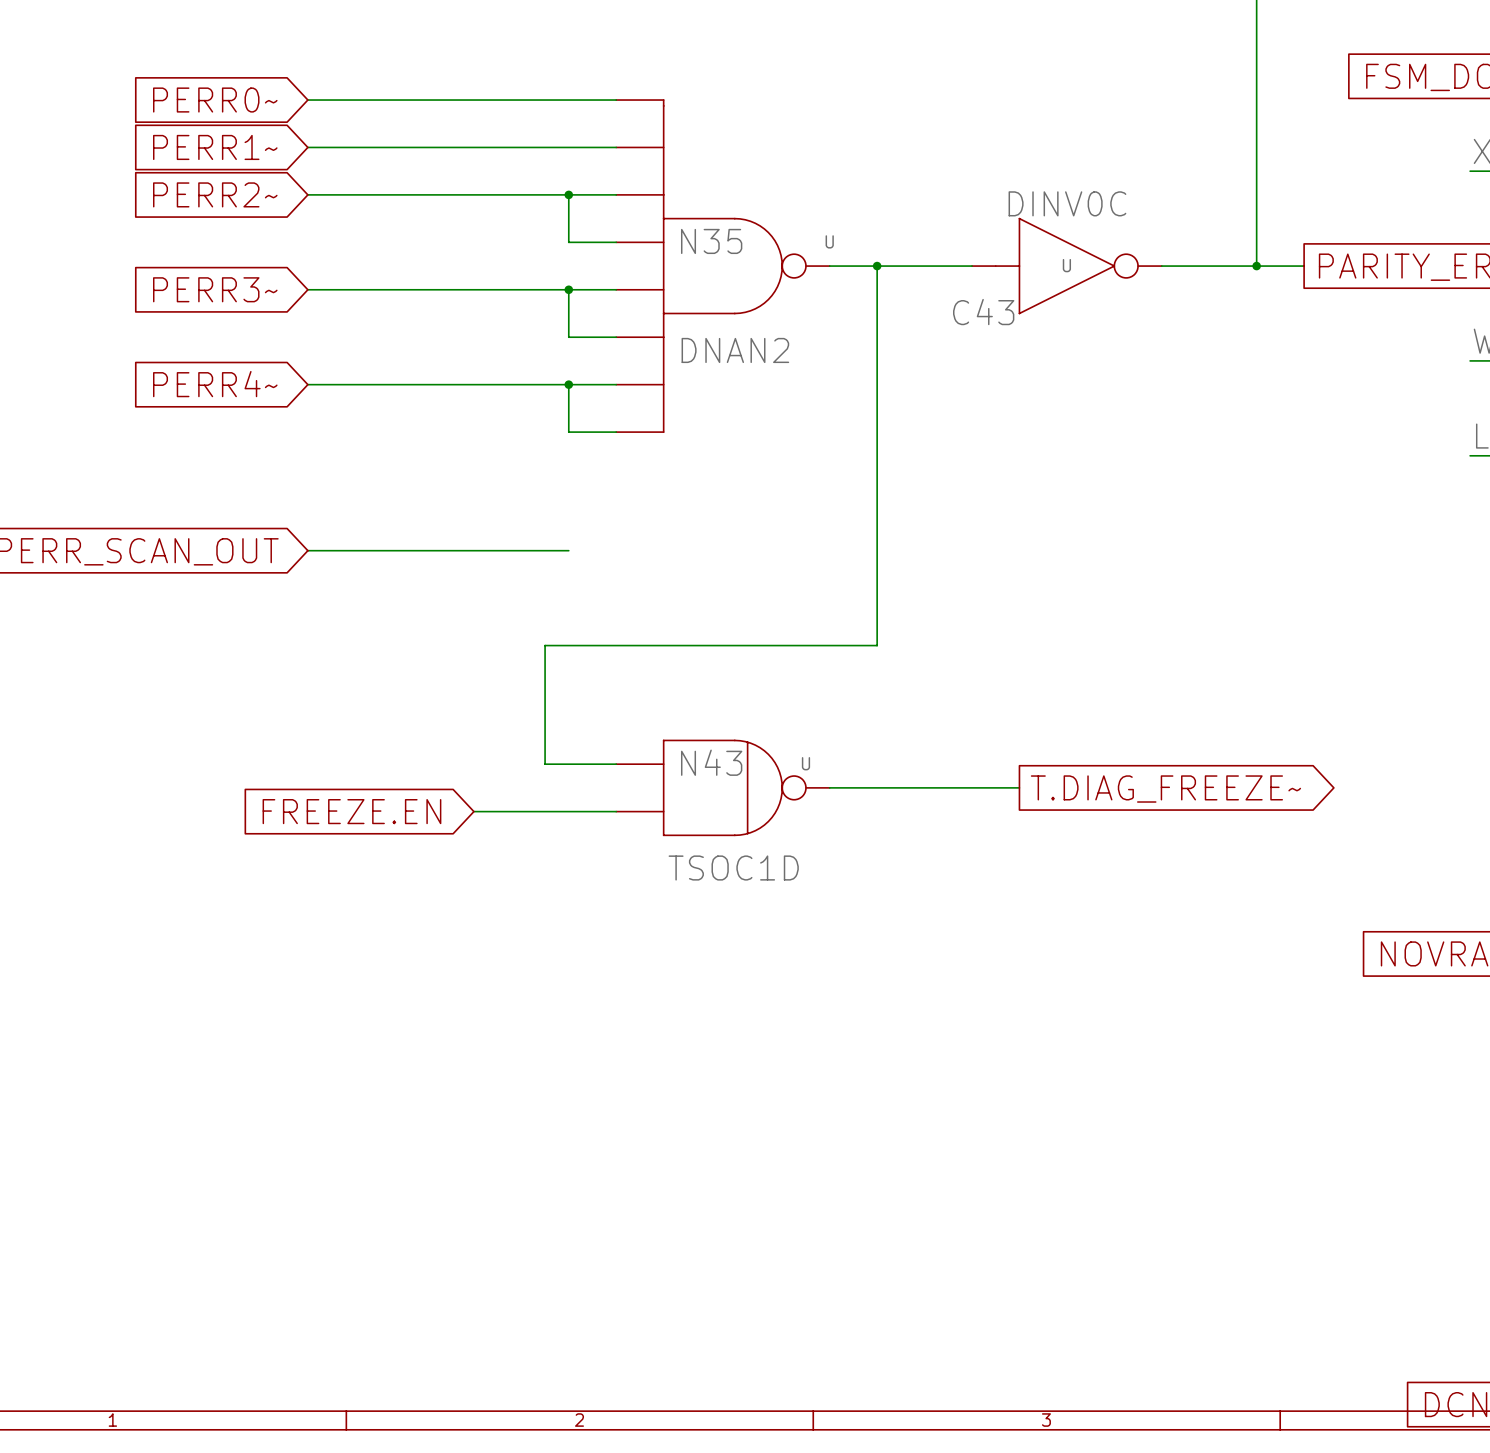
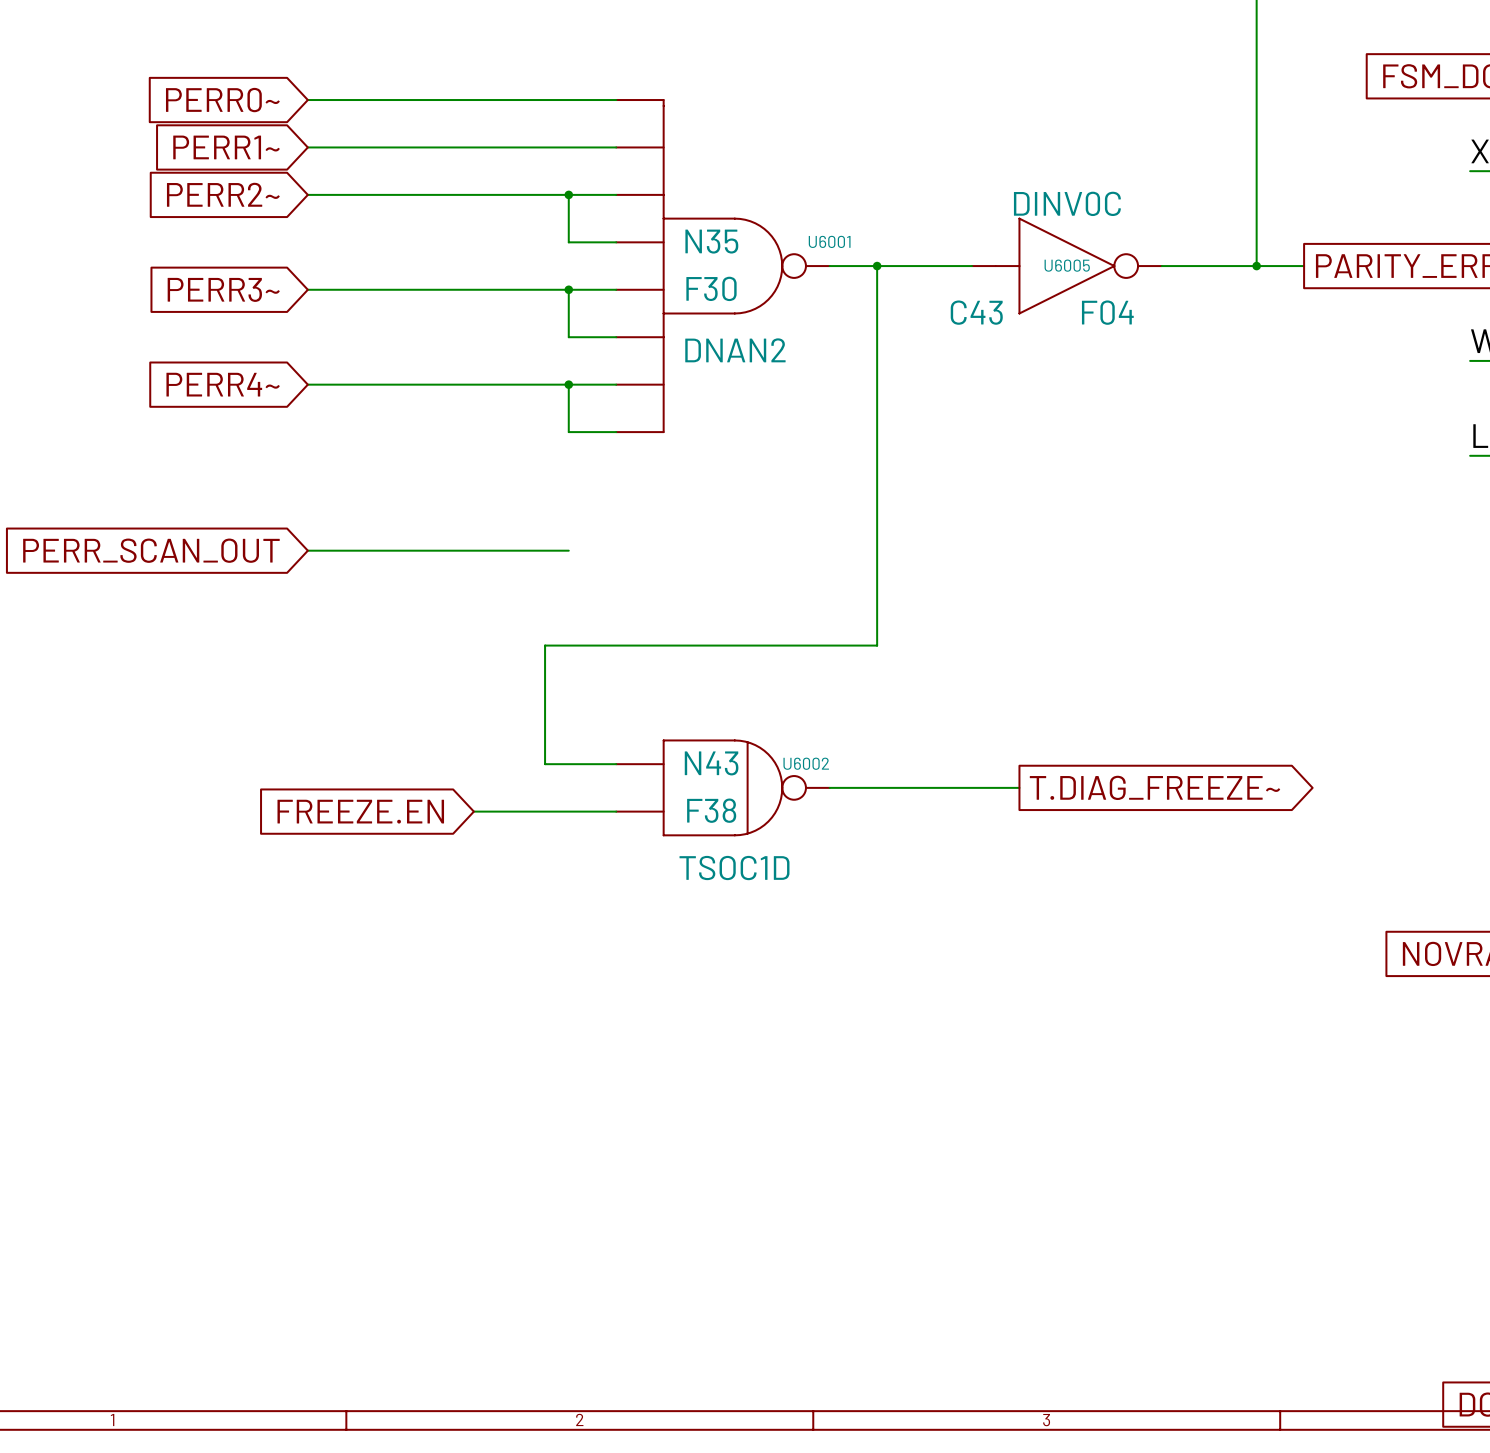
U name: U (829, 241) -> U6001 (829, 241)
U name: U (1066, 265) -> U6005 (1067, 265)
U value: none -> F30 (711, 288)
U value: none -> F04 (1107, 312)
U name: U (805, 763) -> U6002 (806, 763)
U value: none -> F38 (711, 810)

